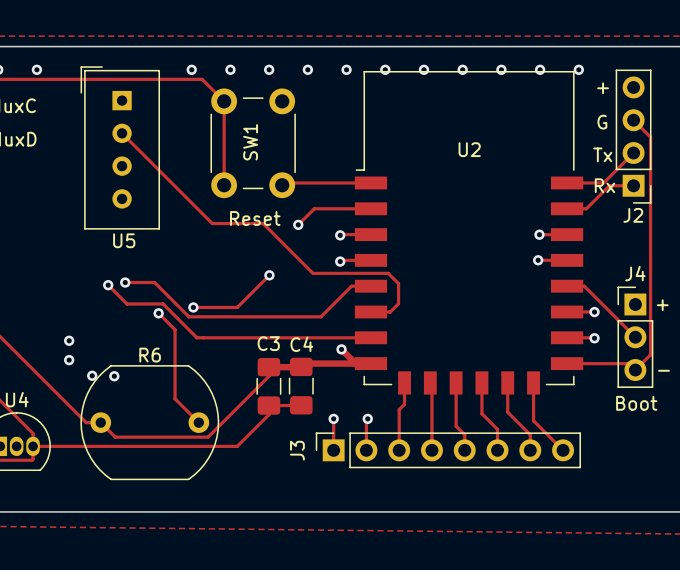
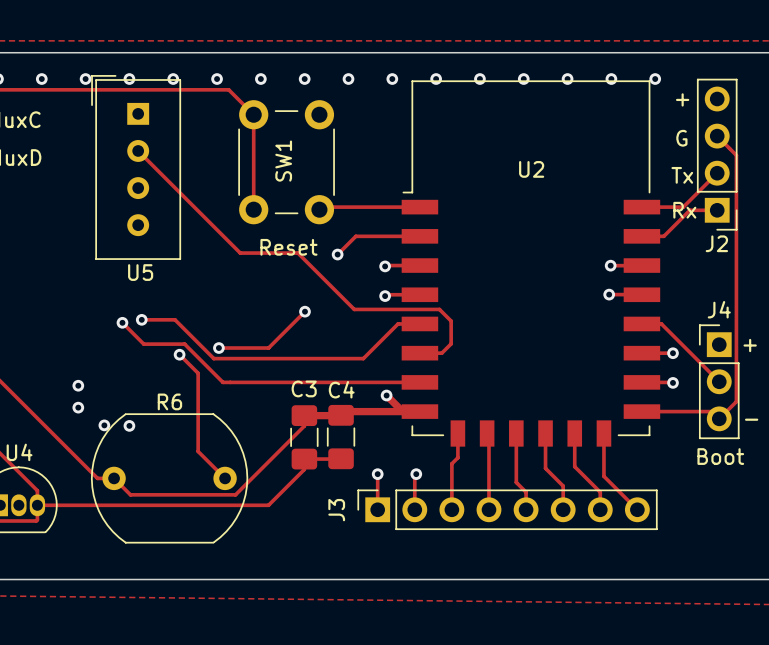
via: none -> (85, 79)
via: none -> (129, 79)
via: none -> (173, 79)

